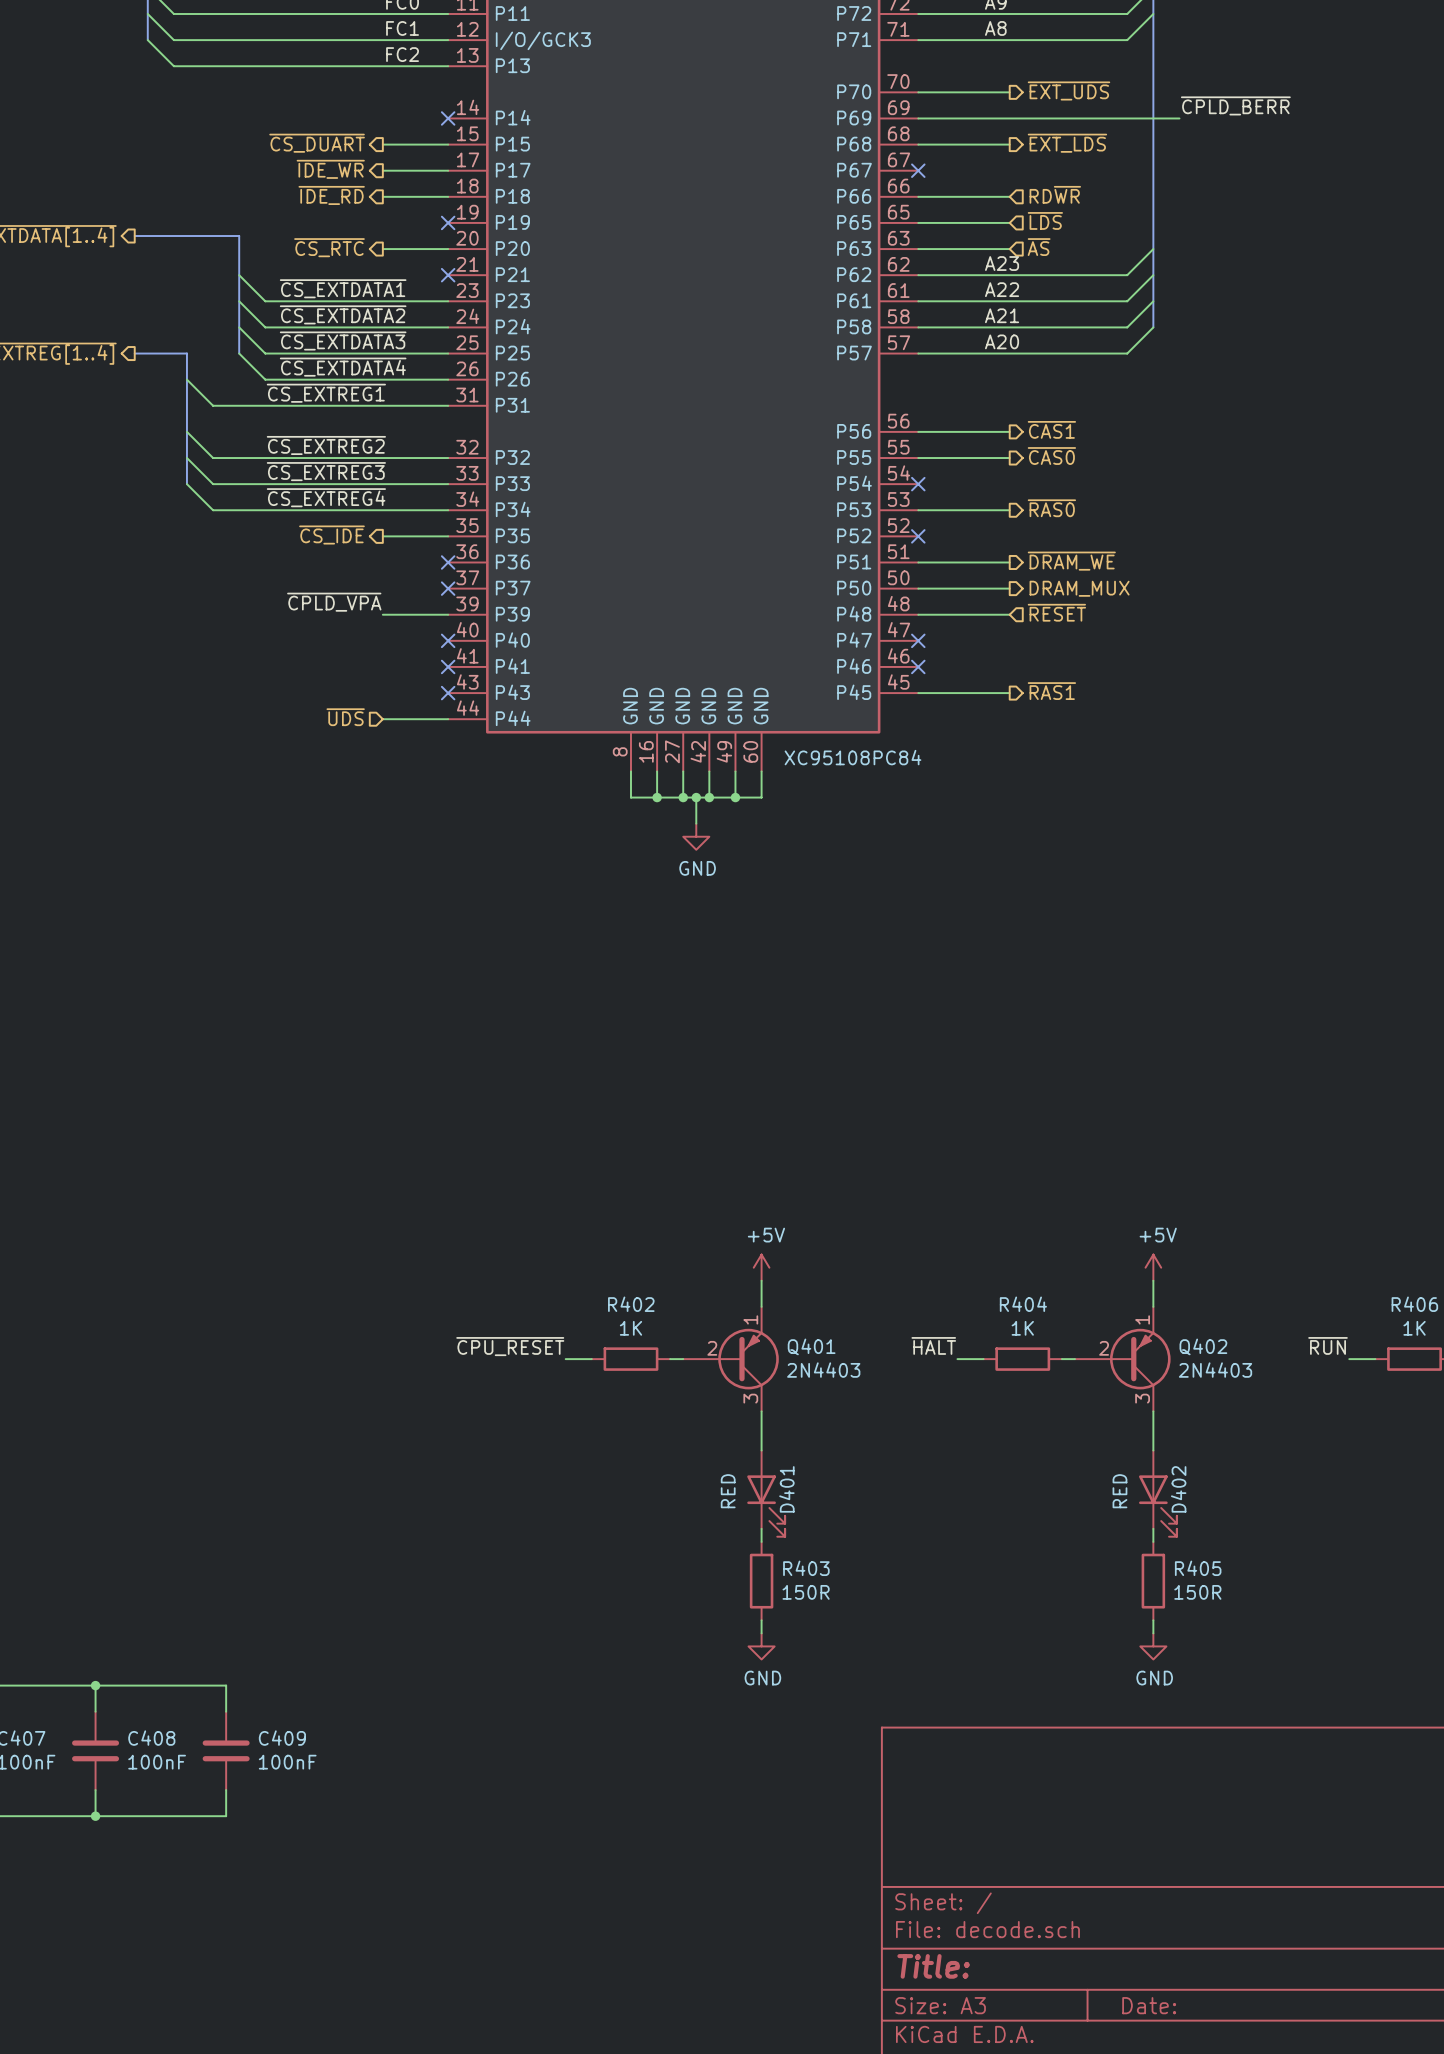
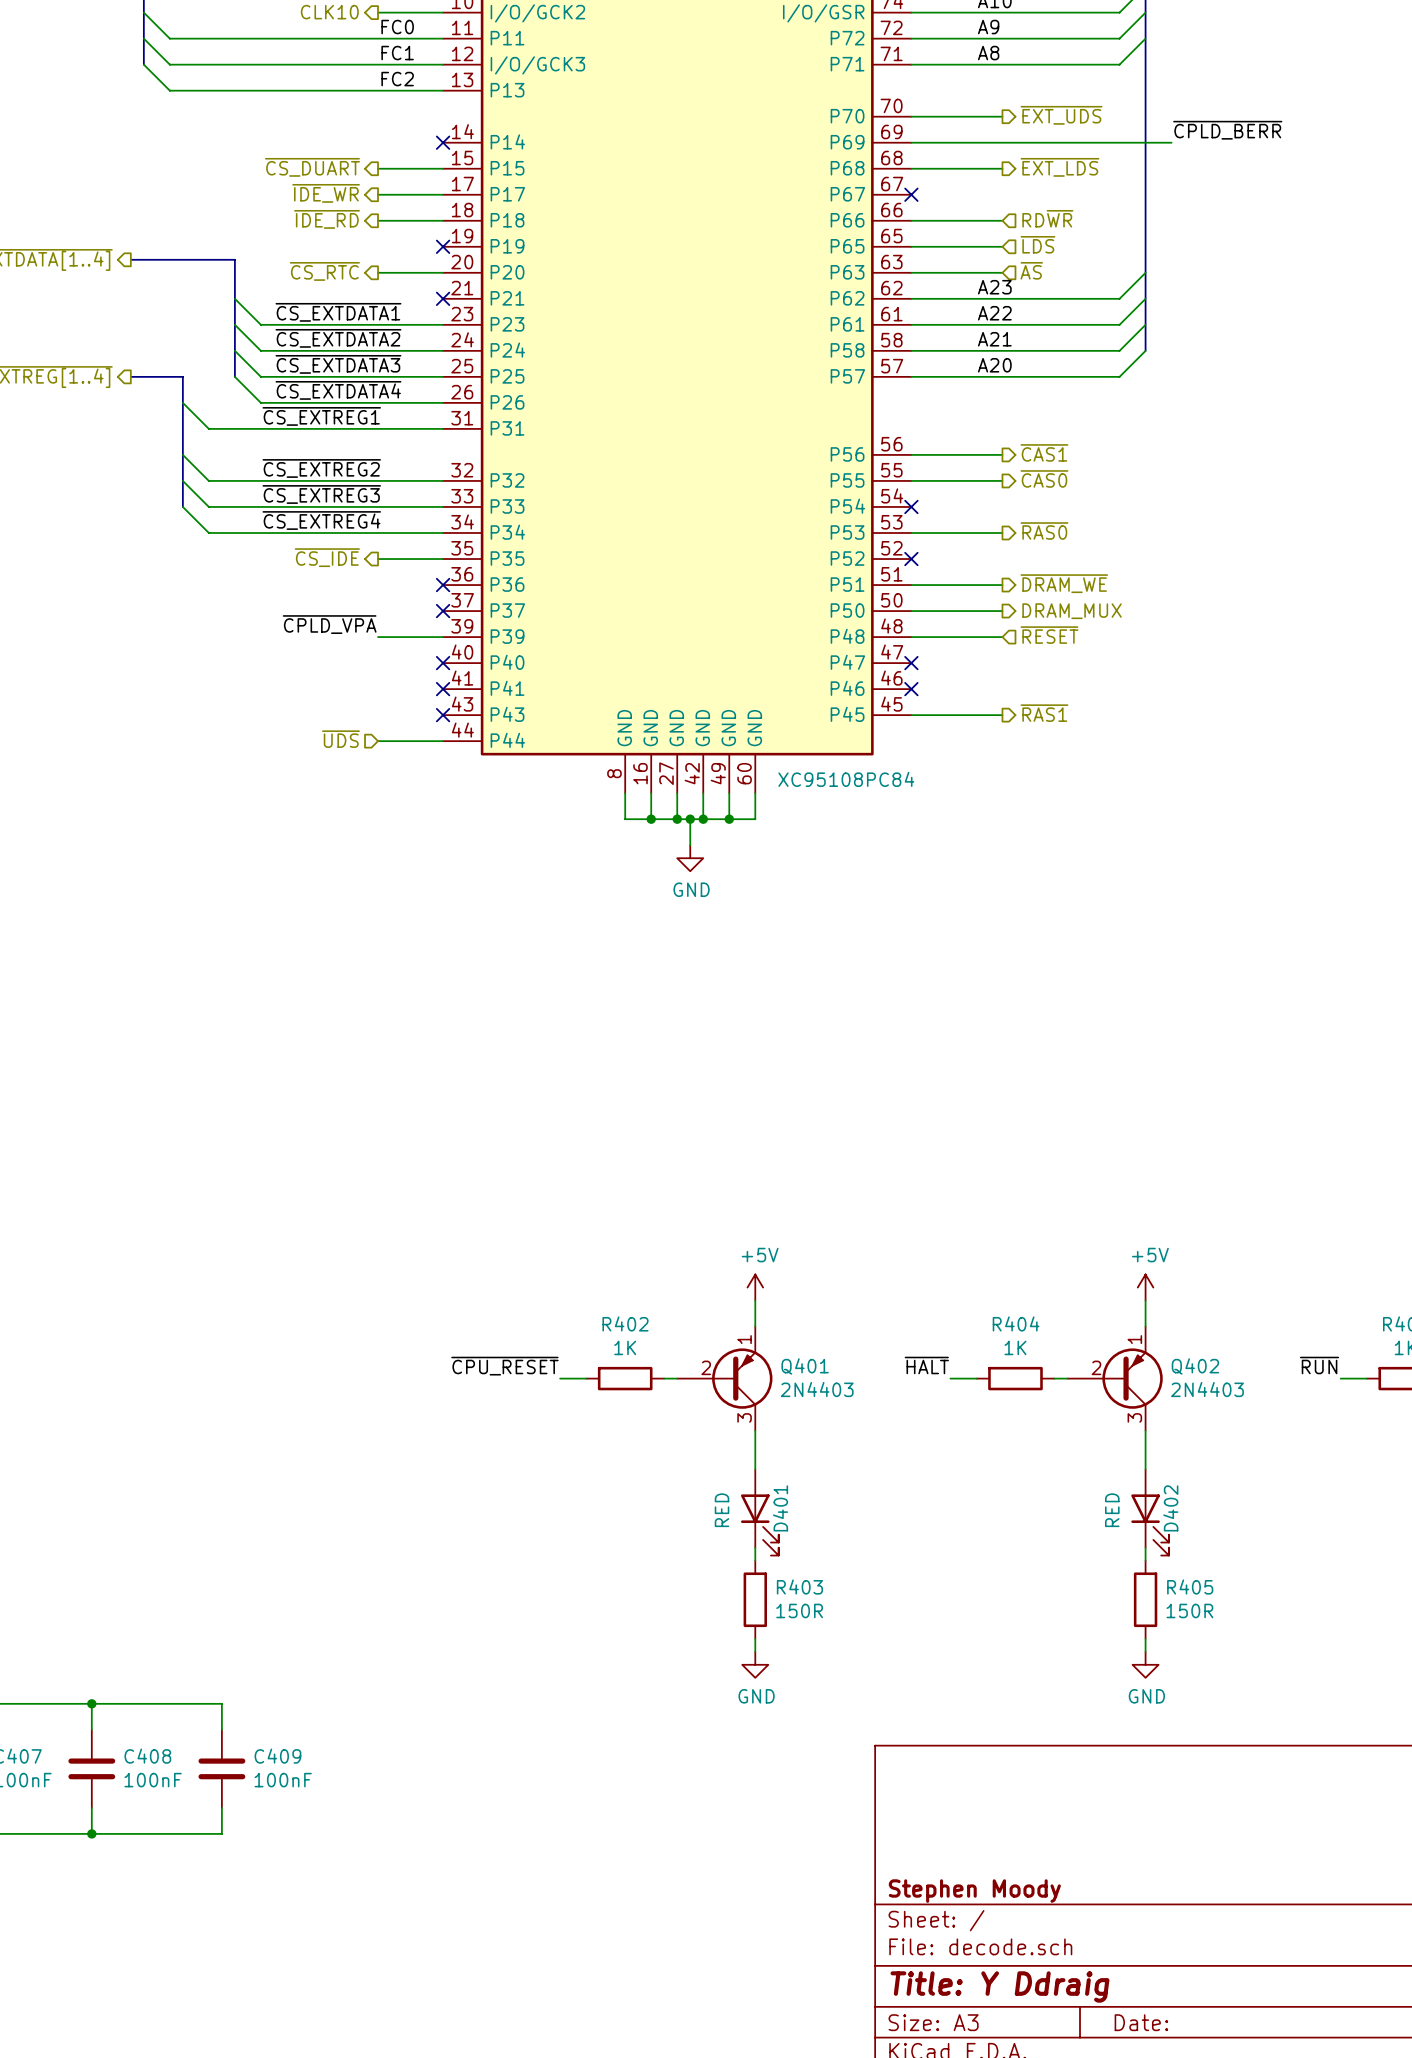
title block: none -> Stephen Moody (974, 1891)
title block: Title: (933, 1966) -> Title: Y Ddraig (999, 1986)

